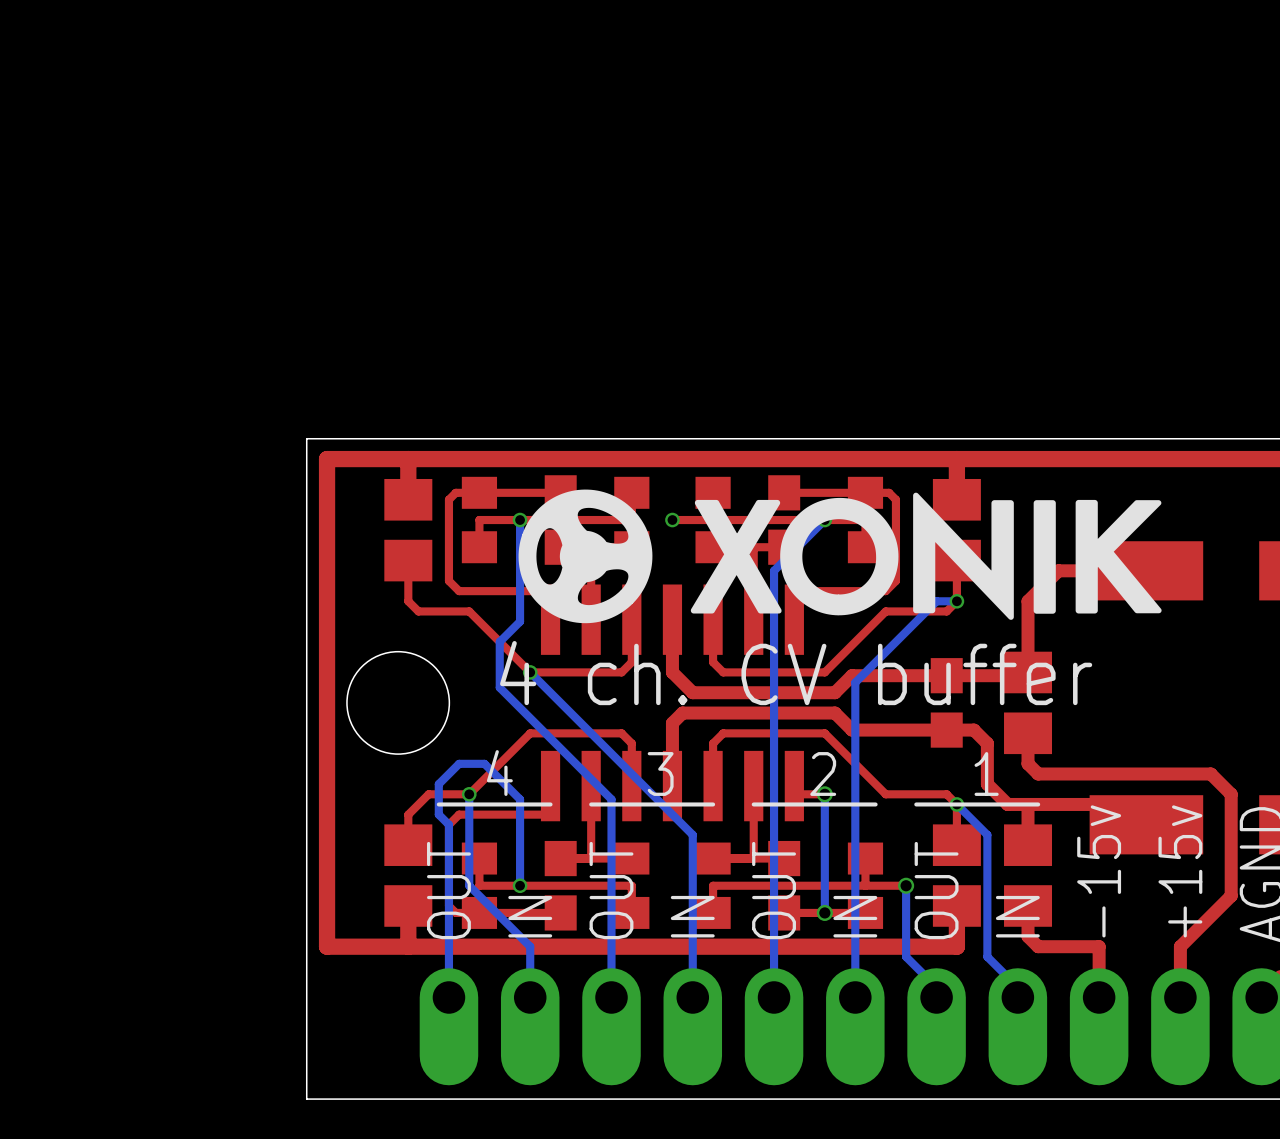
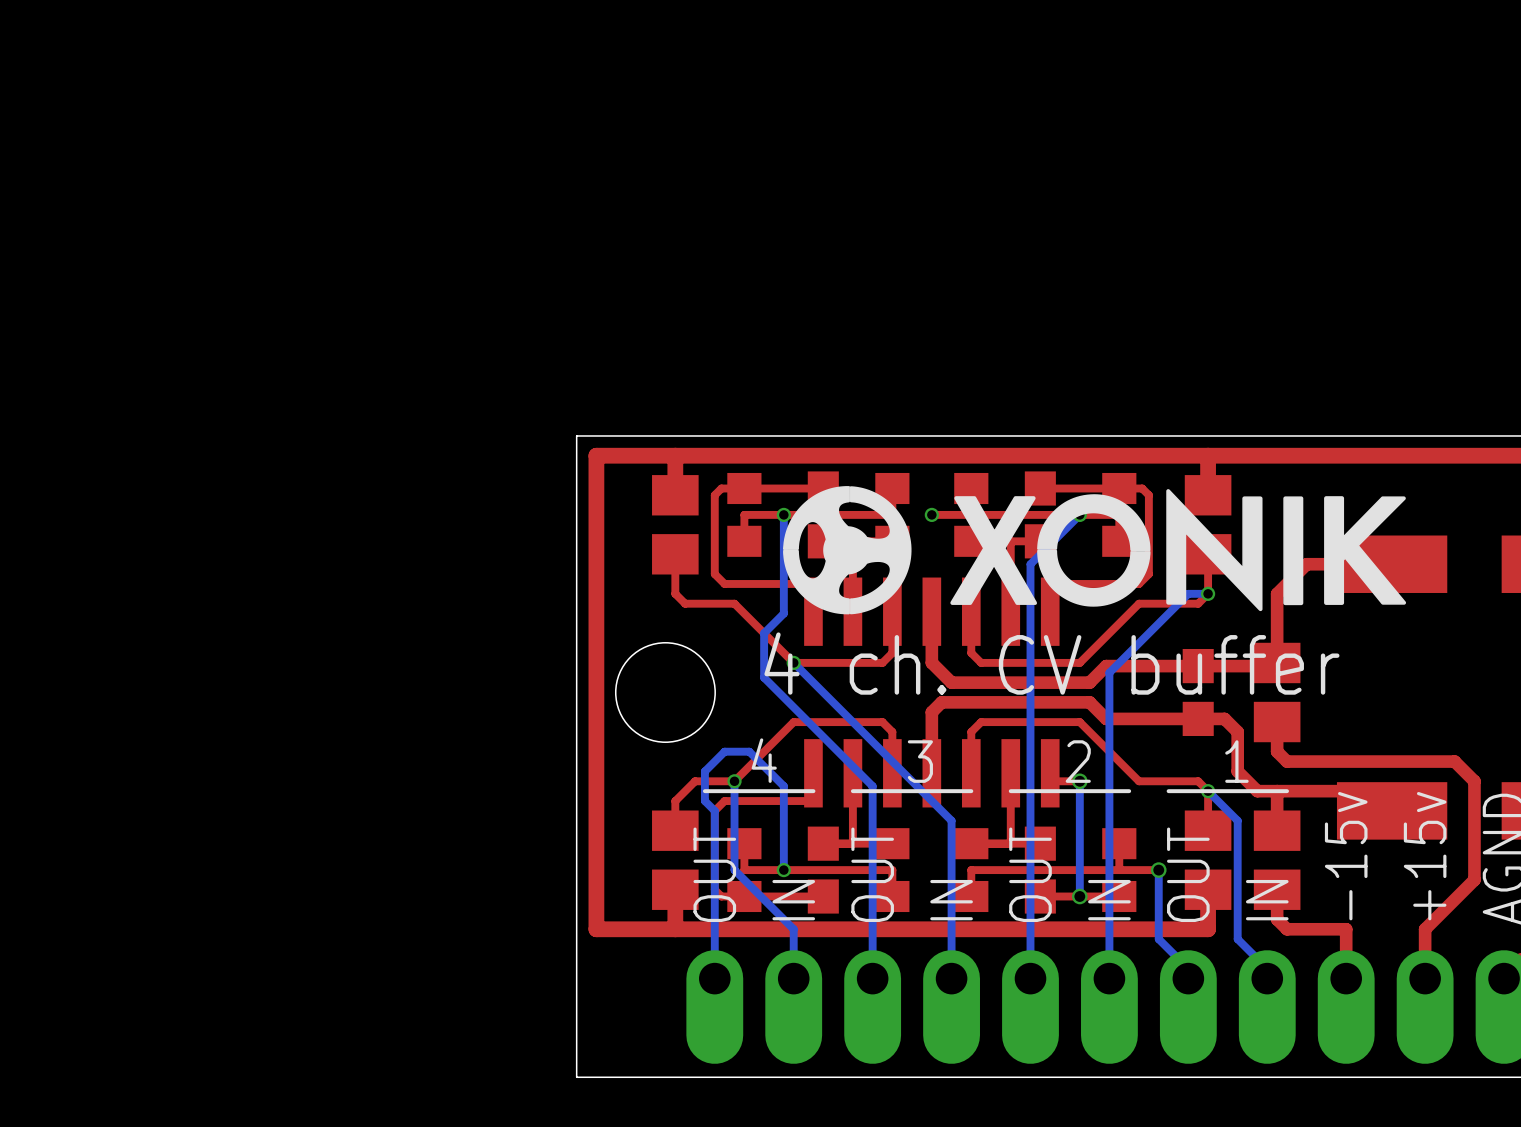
drawing: [518, 489, 653, 624] -> none
drawing: [913, 492, 1162, 620] -> none
drawing shape: [780, 497, 899, 616] -> [782, 486, 1407, 615]
drawing: [690, 499, 782, 614] -> none

